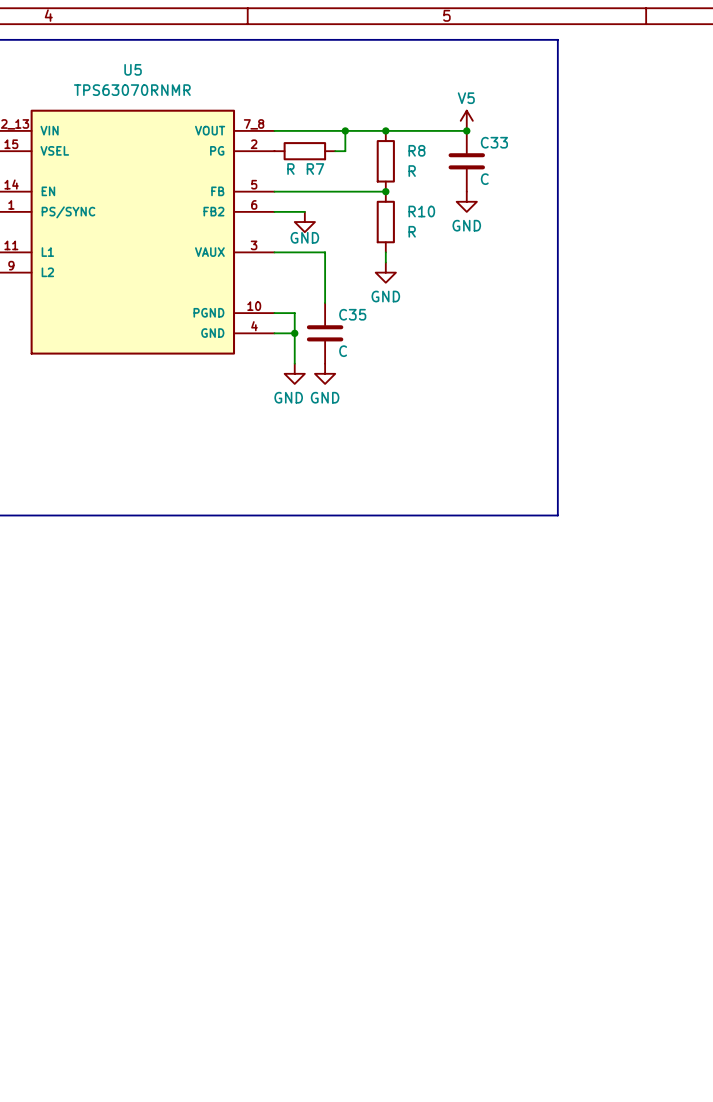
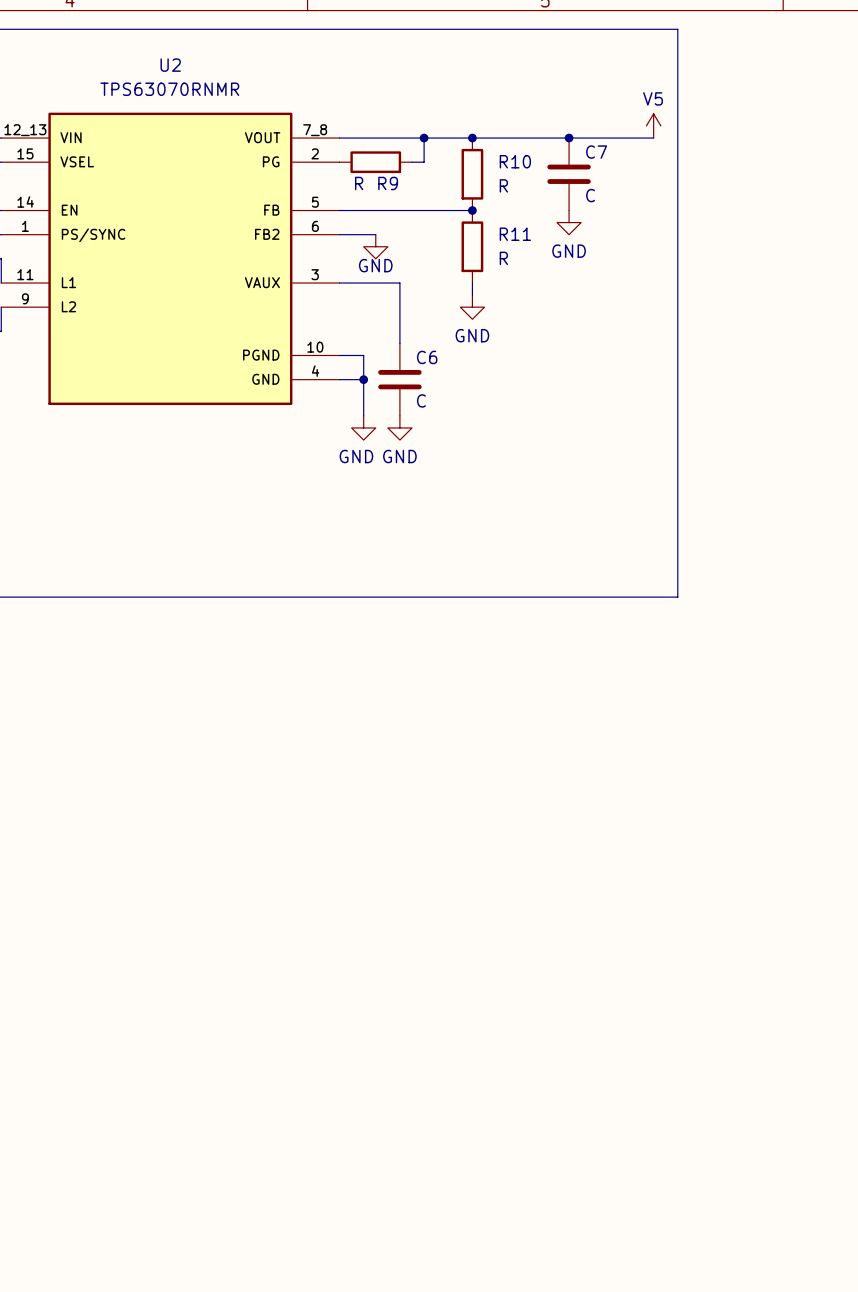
U5 name: U5 (133, 69) -> U2 (170, 65)
power symbol position: V5 (466, 120) -> V5 (653, 125)
wire: none -> (569, 138) (653, 138)
C33 name: C33 (494, 142) -> C7 (596, 152)
R8 name: R8 (416, 150) -> R10 (515, 161)
R7 name: R7 (315, 169) -> R9 (388, 183)
R10 name: R10 (421, 211) -> R11 (515, 234)
C35 name: C35 (352, 314) -> C6 (427, 357)

